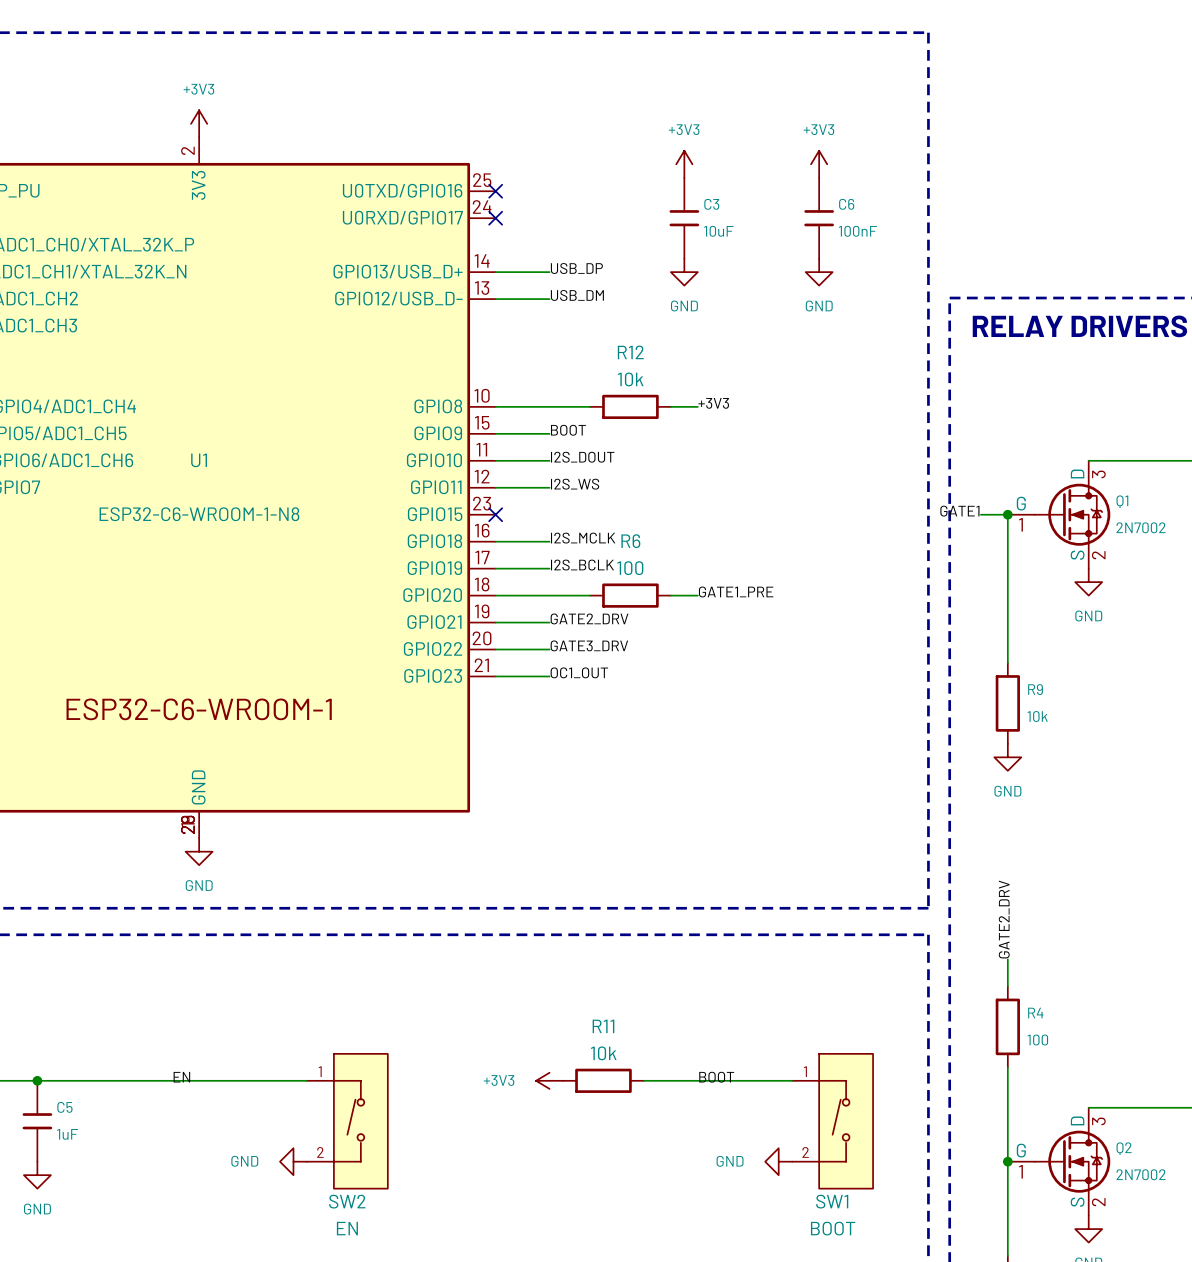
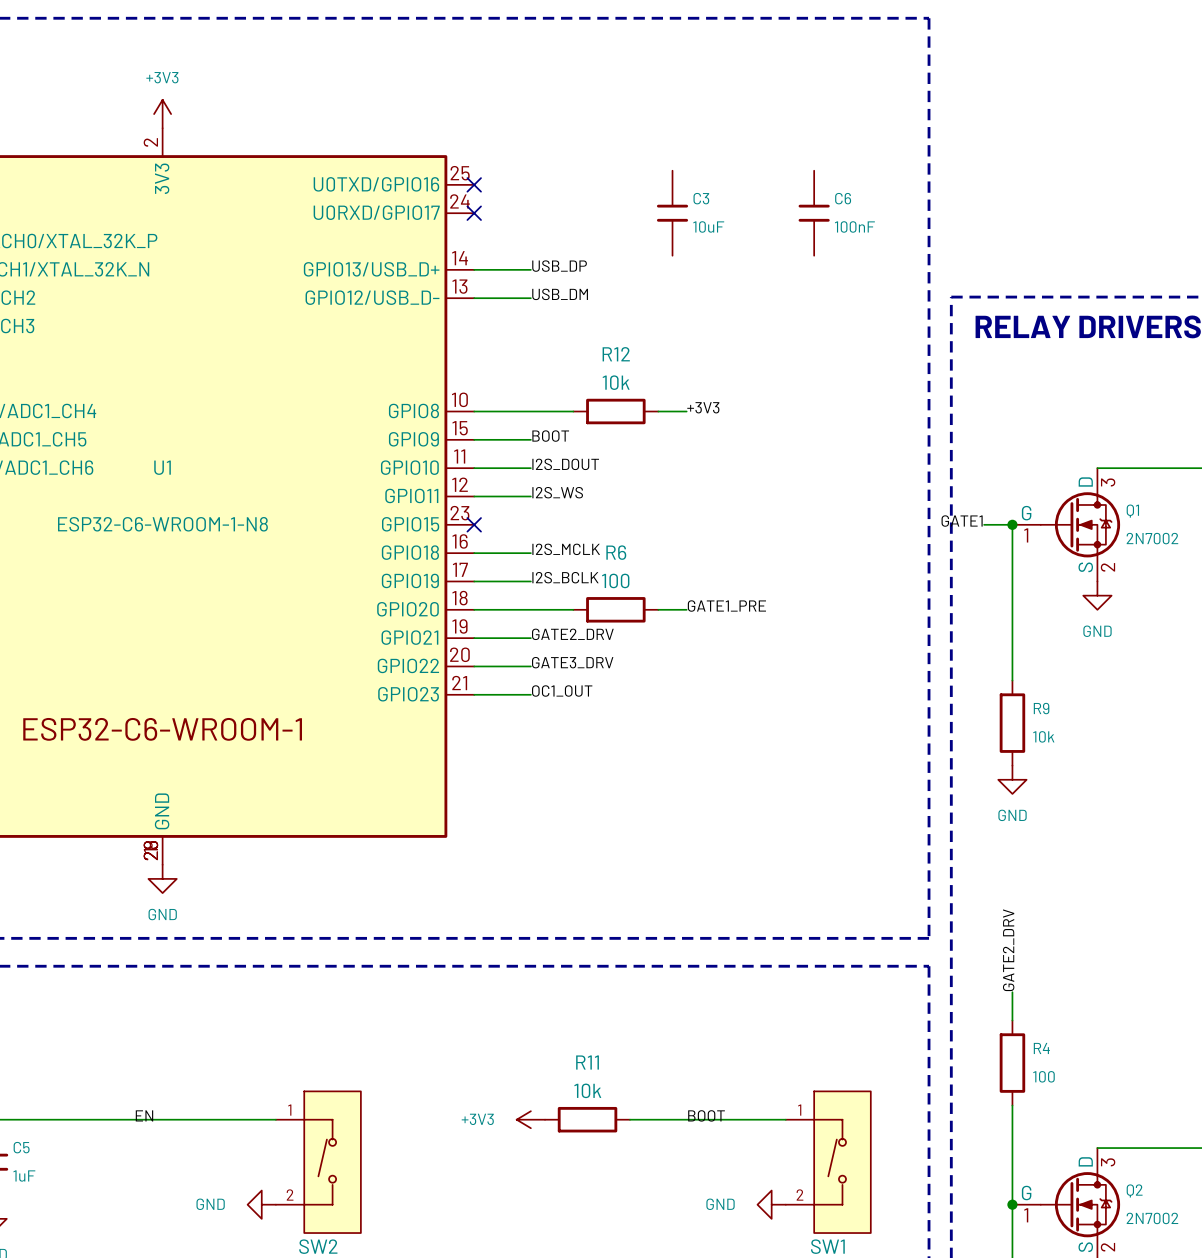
power symbol: +3V3 (684, 164) -> none
power symbol: +3V3 (819, 164) -> none
power symbol: GND (684, 272) -> none
power symbol: GND (819, 272) -> none

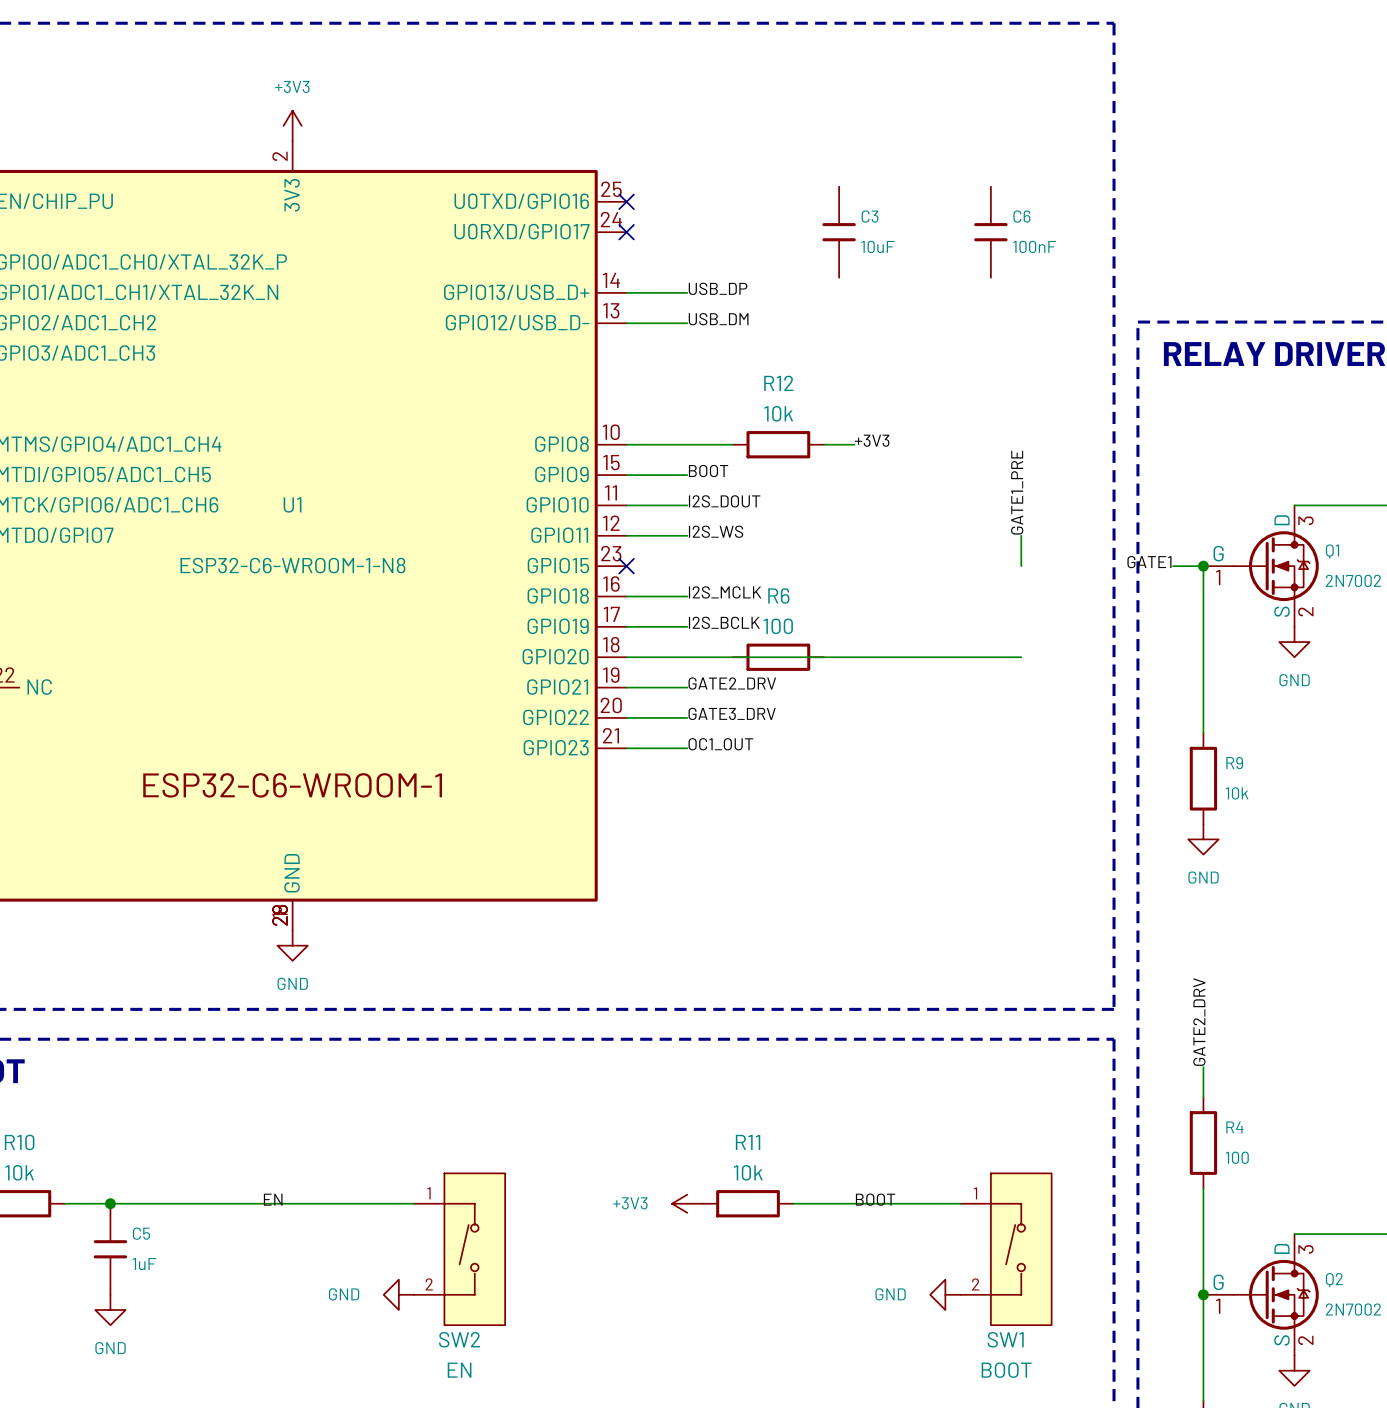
wire: none -> (1021, 535) (1021, 566)
label rotation: 0° (726, 606) -> 90° counterclockwise (1017, 492)
label position: GATE1_PRE (726, 606) -> GATE1_PRE (1017, 492)
wire: none -> (732, 657) (823, 657)
wire: none -> (854, 657) (1021, 657)

